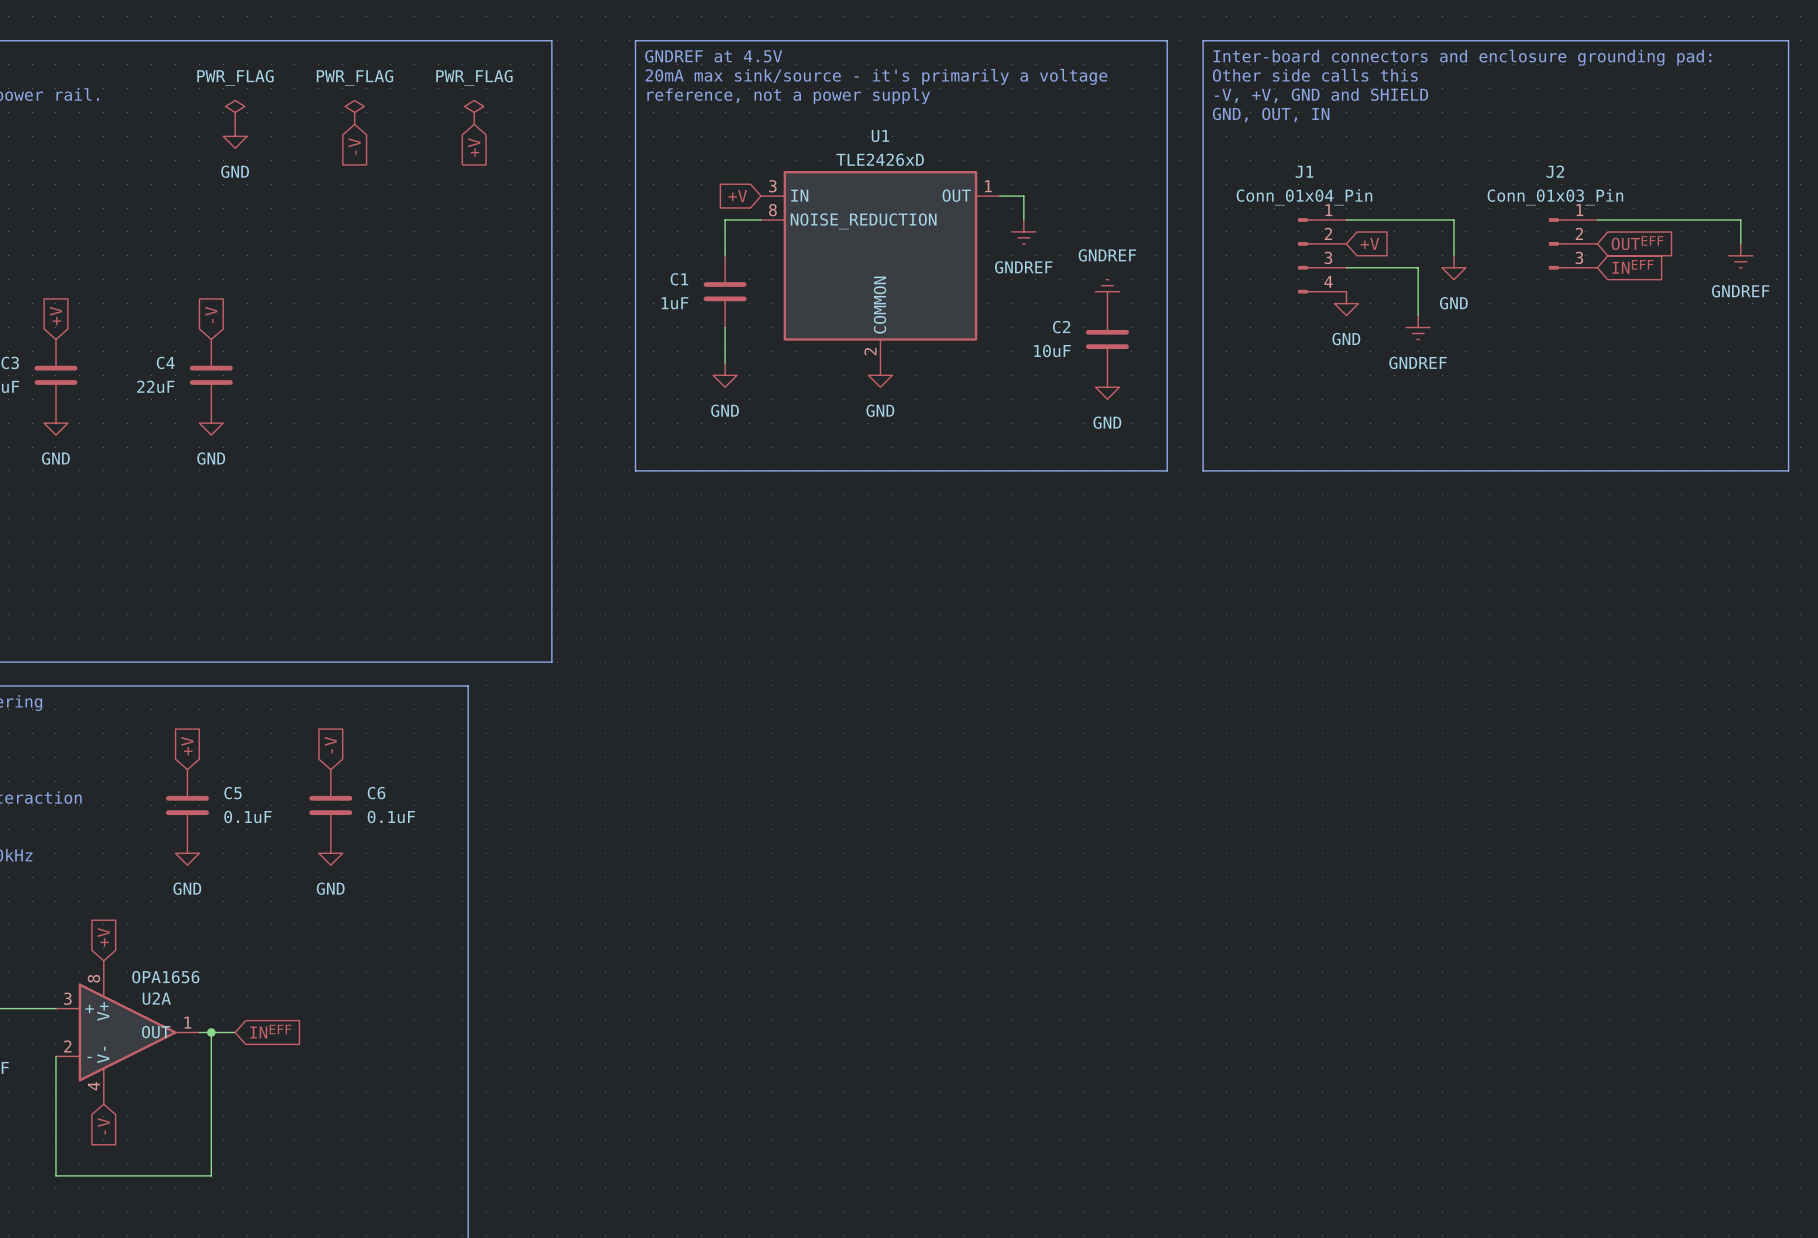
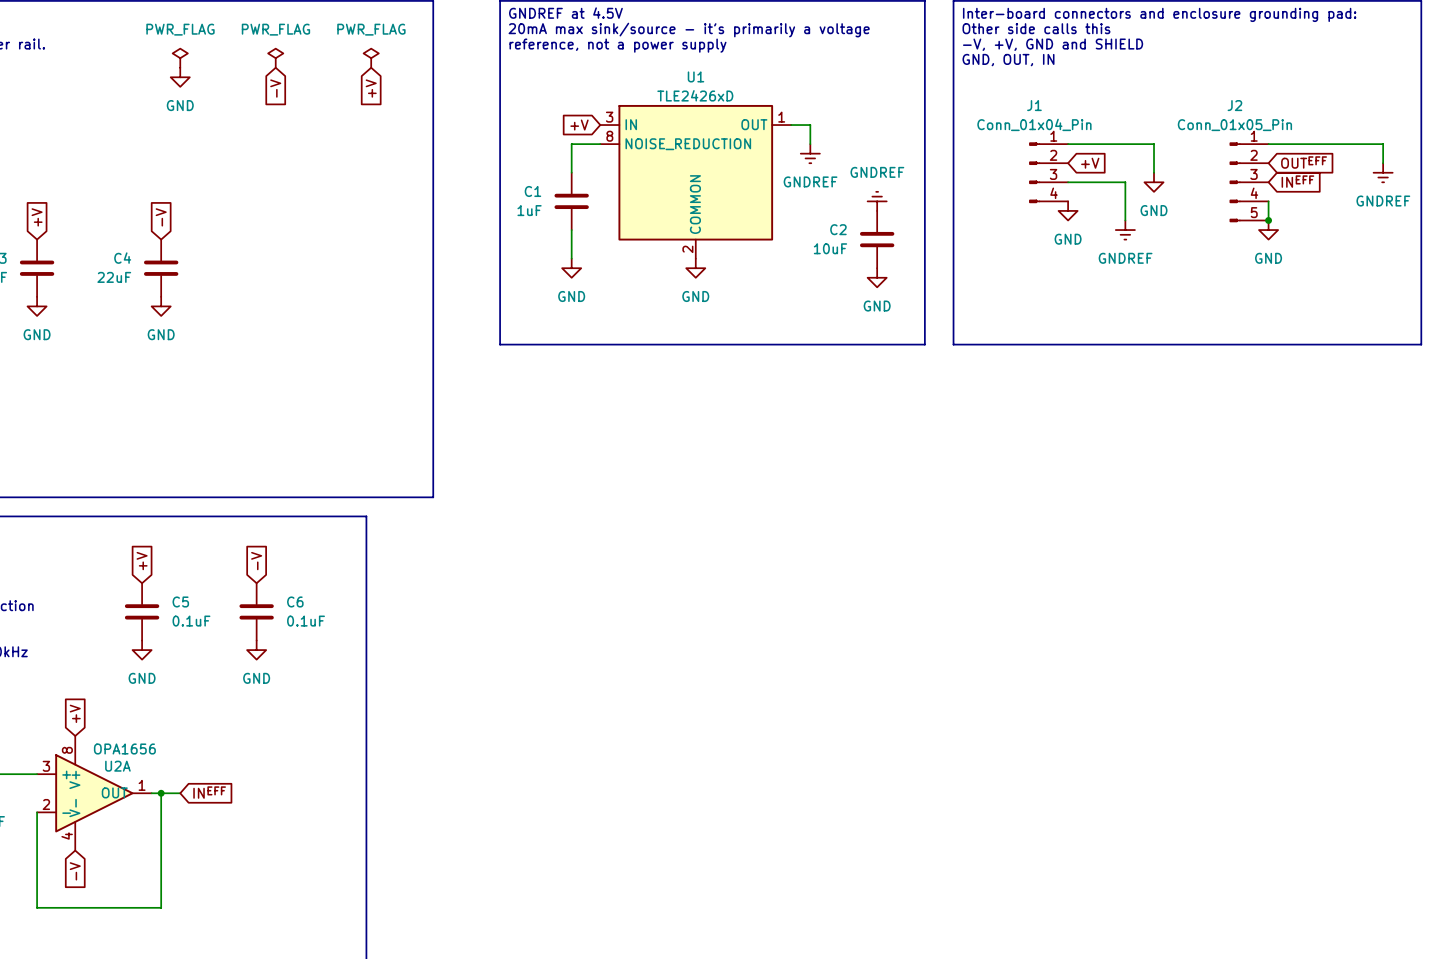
J2 value: Conn_01x03_Pin (1555, 197) -> Conn_01x05_Pin (1234, 125)
J2 symbol: [1548, 218, 1598, 270] -> [1229, 142, 1269, 223]
wire: none -> (1268, 201) (1268, 220)
junction: none -> (1268, 220)
power symbol: none -> GND (1268, 230)

